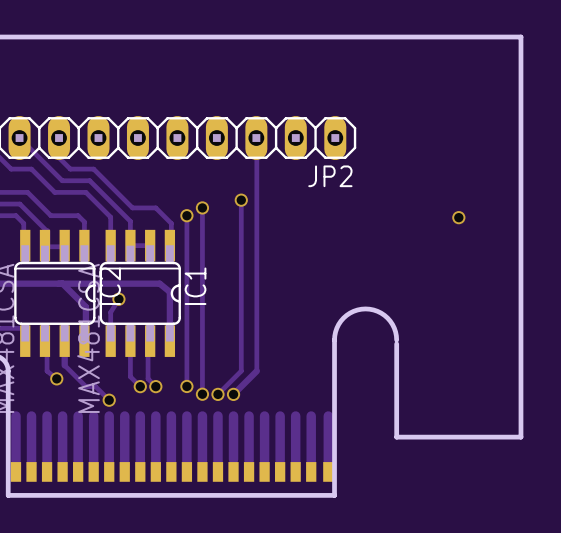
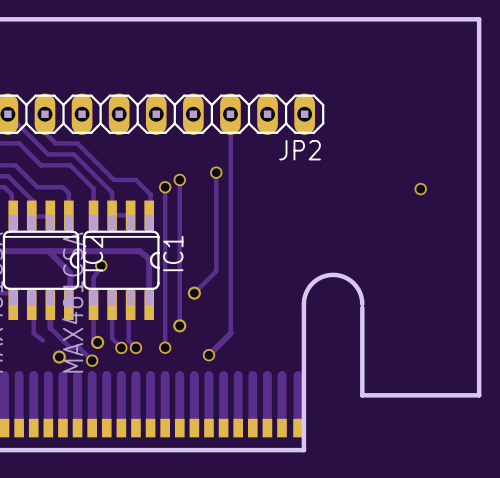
track: (241, 305) (241, 371) (217, 394) -> (216, 271) (194, 293)
via: none -> (194, 293)
track: none -> (93, 305) (93, 338) (97, 342)
track: (202, 363) (202, 394) -> none
via: none -> (179, 325)
via: (56, 378) -> none
via: none -> (97, 342)
via: (202, 394) -> none
via: (217, 394) -> none
via: none -> (59, 357)

